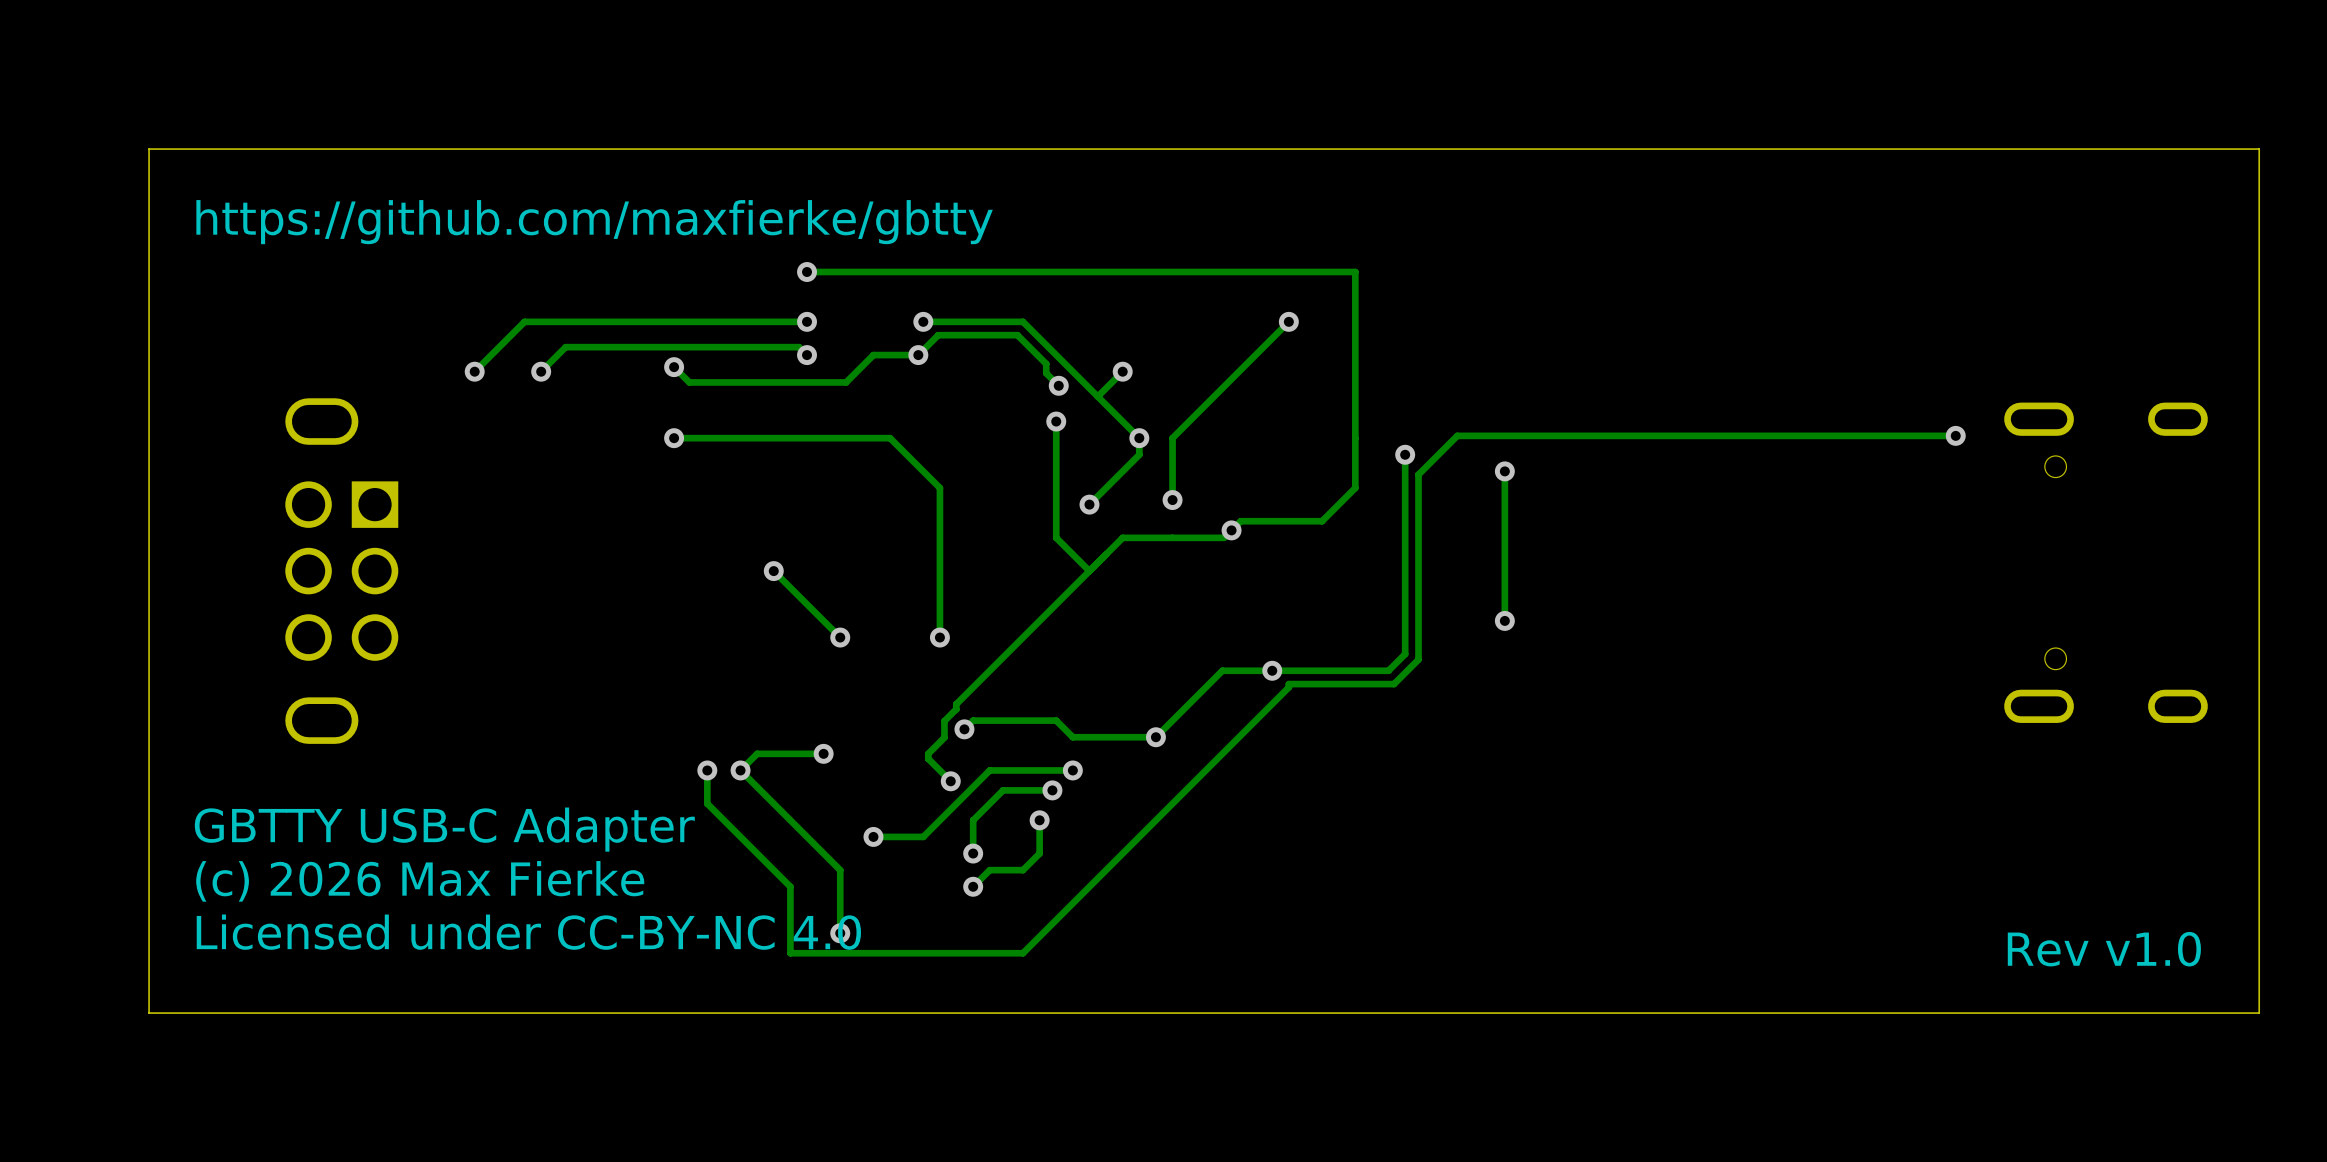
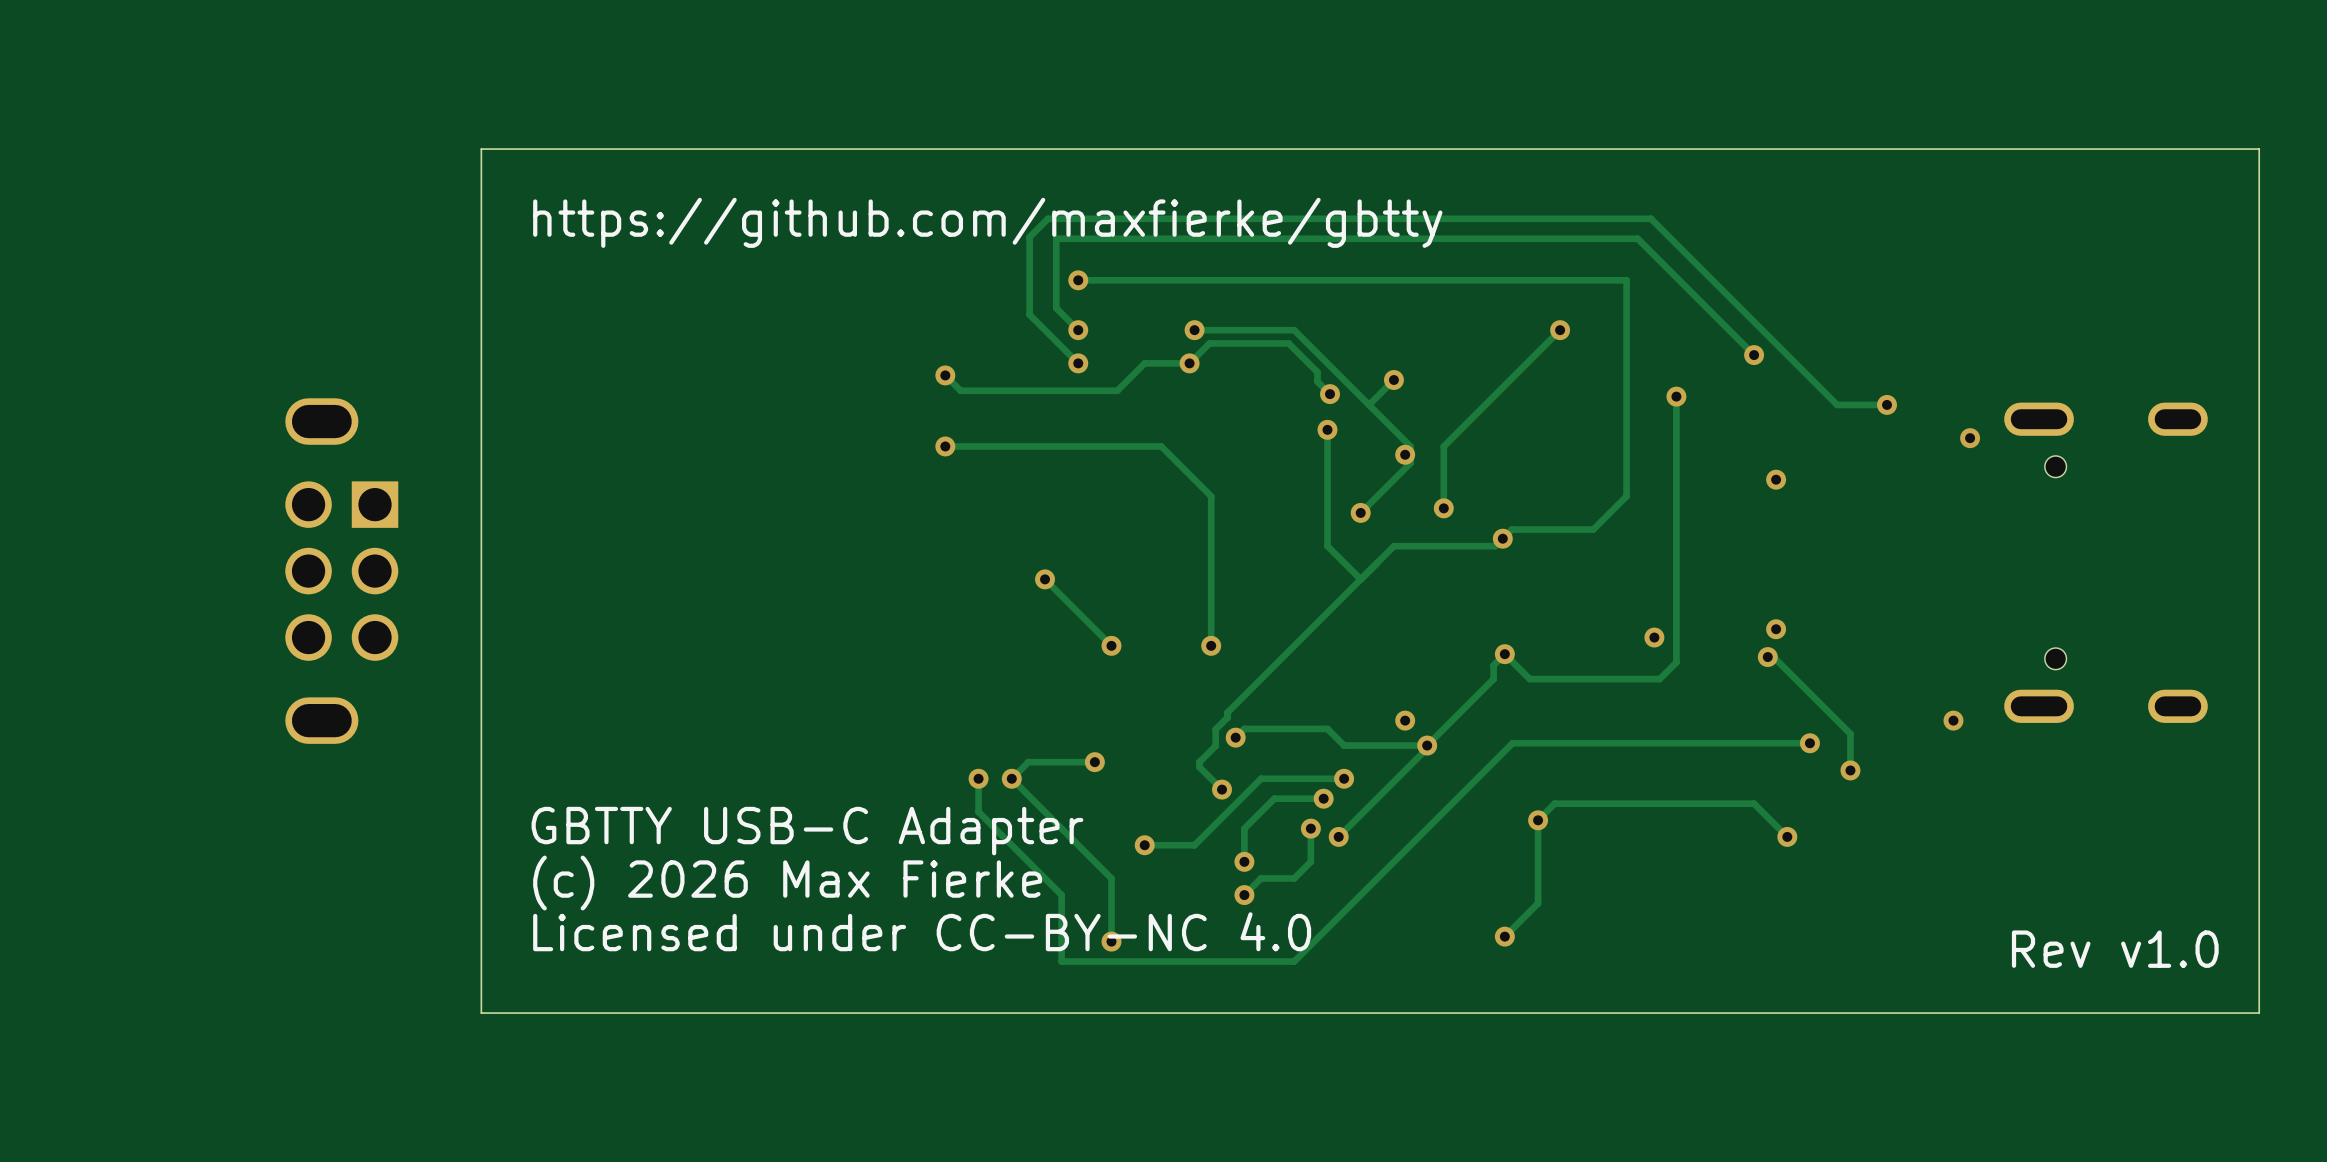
board edge: (481, 149) (149, 149) (149, 1013) (481, 1013) -> (481, 149) (481, 1013)
text position: https://github.com/maxfierke/gbtty (594, 222) -> https://github.com/maxfierke/gbtty (987, 222)
track: (807, 272) (1355, 272) (1355, 488) (1322, 521) (1240, 521) (1224, 537) (1122, 537) (956, 704) (956, 709) (944, 721) (944, 737) (928, 753) (928, 758) (950, 781) -> (1078, 280) (1626, 280) (1626, 496) (1593, 529) (1511, 529) (1495, 546) (1393, 546) (1227, 712) (1227, 717) (1215, 729) (1215, 745) (1199, 762) (1199, 767) (1222, 789)
via: (807, 272) -> none
via: none -> (1078, 280)
track: (807, 321) (524, 321) (474, 371) -> none
via: (807, 321) -> none
track: (923, 321) (1023, 321) (1139, 438) (1139, 454) (1089, 504) -> (1194, 330) (1294, 330) (1410, 446) (1410, 463) (1360, 512)
via: (923, 321) -> none
track: (1288, 321) (1172, 438) (1172, 500) -> (1560, 330) (1443, 446) (1443, 508)
via: (1288, 321) -> none
track: none -> (1078, 330) (1056, 308) (1056, 238) (1637, 238) (1754, 355)
via: none -> (1078, 330)
via: none -> (1194, 330)
via: none -> (1560, 330)
track: (807, 355) (799, 347) (565, 347) (541, 371) -> none
via: (807, 355) -> none
via: (918, 355) -> none
via: none -> (1754, 355)
track: none -> (1078, 363) (1029, 314) (1029, 237) (1047, 218) (1651, 218) (1837, 404) (1887, 404)
via: none -> (1078, 363)
via: none -> (1189, 363)
track: (674, 367) (689, 382) (846, 382) (873, 355) (918, 355) (938, 335) (1017, 335) (1046, 363) (1046, 373) (1058, 385) -> (945, 375) (960, 390) (1117, 390) (1144, 363) (1189, 363) (1209, 343) (1288, 343) (1317, 372) (1317, 381) (1330, 394)
via: (674, 367) -> none
via: (474, 371) -> none
via: (541, 371) -> none
track: (1122, 371) (1097, 396) -> (1393, 380) (1369, 404)
via: (1122, 371) -> none
via: none -> (945, 375)
via: none -> (1393, 380)
via: (1058, 385) -> none
via: none -> (1330, 394)
track: none -> (1676, 396) (1676, 662) (1659, 679) (1529, 679) (1504, 654) (1493, 665) (1493, 679) (1427, 745)
via: none -> (1676, 396)
via: none -> (1887, 404)
track: (1056, 421) (1056, 537) (1089, 571) -> (1327, 429) (1327, 546) (1360, 579)
via: (1056, 421) -> none
via: none -> (1327, 429)
track: (1955, 435) (1457, 435) (1418, 474) (1418, 659) (1394, 684) (1288, 684) (1288, 687) (1023, 953) (790, 953) (790, 886) (707, 803) (707, 770) -> none
via position: (1955, 435) -> (1970, 438)
track: (674, 438) (890, 438) (939, 488) (939, 637) -> (945, 446) (1161, 446) (1211, 496) (1211, 645)
via: (674, 438) -> none
via: (1139, 438) -> none
via: none -> (945, 446)
track: (1405, 454) (1405, 654) (1388, 670) (1222, 670) (1155, 737) (1072, 737) (1056, 720) (973, 720) (964, 729) -> none
track: (1504, 471) (1504, 620) -> none
via: (1504, 471) -> none
via: none -> (1776, 479)
via: (1172, 500) -> none
via: (1089, 504) -> none
via: none -> (1443, 508)
via: none -> (1360, 512)
via: (1231, 530) -> none
via: none -> (1502, 538)
track: (773, 571) (840, 637) -> (1045, 579) (1111, 645)
via: (773, 571) -> none
via: none -> (1045, 579)
via position: (1504, 620) -> (1504, 654)
via: none -> (1776, 629)
via: (840, 637) -> none
via: (939, 637) -> none
via: none -> (1654, 637)
via: none -> (1111, 645)
via: none -> (1211, 645)
track: none -> (1767, 657) (1773, 657) (1850, 733) (1850, 770)
via: none -> (1767, 657)
via: (1272, 670) -> none
via: none -> (1405, 720)
via: none -> (1953, 720)
via: (964, 729) -> none
via: (1155, 737) -> none
track: none -> (1235, 737) (1244, 728) (1327, 728) (1344, 745) (1427, 745)
via: none -> (1235, 737)
track: none -> (1809, 743) (1512, 743) (1294, 961) (1061, 961) (1061, 895) (978, 812) (978, 778)
via: none -> (1809, 743)
track: none -> (1427, 745) (1427, 748) (1338, 836)
via: none -> (1427, 745)
track: (823, 753) (757, 753) (740, 770) (840, 870) (840, 933) -> (1094, 762) (1028, 762) (1011, 778) (1111, 878) (1111, 941)
via: (823, 753) -> none
via: (707, 770) -> none
via: (740, 770) -> none
track: (1072, 770) (989, 770) (923, 836) (873, 836) -> (1344, 778) (1261, 778) (1194, 845) (1144, 845)
via position: (1072, 770) -> (1094, 762)
via: none -> (1850, 770)
via: none -> (978, 778)
via: none -> (1011, 778)
via: none -> (1344, 778)
via: (950, 781) -> none
via: none -> (1222, 789)
track: (1052, 790) (1003, 790) (973, 820) (973, 853) -> (1323, 798) (1274, 798) (1244, 828) (1244, 861)
via: (1052, 790) -> none
via: none -> (1323, 798)
track: (1039, 820) (1039, 853) (1023, 870) (989, 870) (973, 886) -> (1310, 828) (1310, 861) (1294, 878) (1261, 878) (1244, 895)
via: (1039, 820) -> none
via: none -> (1538, 820)
via: none -> (1310, 828)
text position: GBTTY USB-C Adapter (444, 829) -> GBTTY USB-C Adapter (807, 831)
via: (873, 836) -> none
via: none -> (1338, 836)
track: none -> (1787, 836) (1754, 803) (1554, 803) (1538, 820) (1538, 903) (1504, 936)
via: none -> (1787, 836)
via: none -> (1144, 845)
via: (973, 853) -> none
via: none -> (1244, 861)
text position: (c) 2026 Max Fierke (420, 881) -> (c) 2026 Max Fierke (787, 883)
via: (973, 886) -> none
via: none -> (1244, 895)
text position: Licensed under CC-BY-NC 4.0 (528, 932) -> Licensed under CC-BY-NC 4.0 (922, 931)
via: (840, 933) -> none
via: none -> (1504, 936)
via: none -> (1111, 941)

